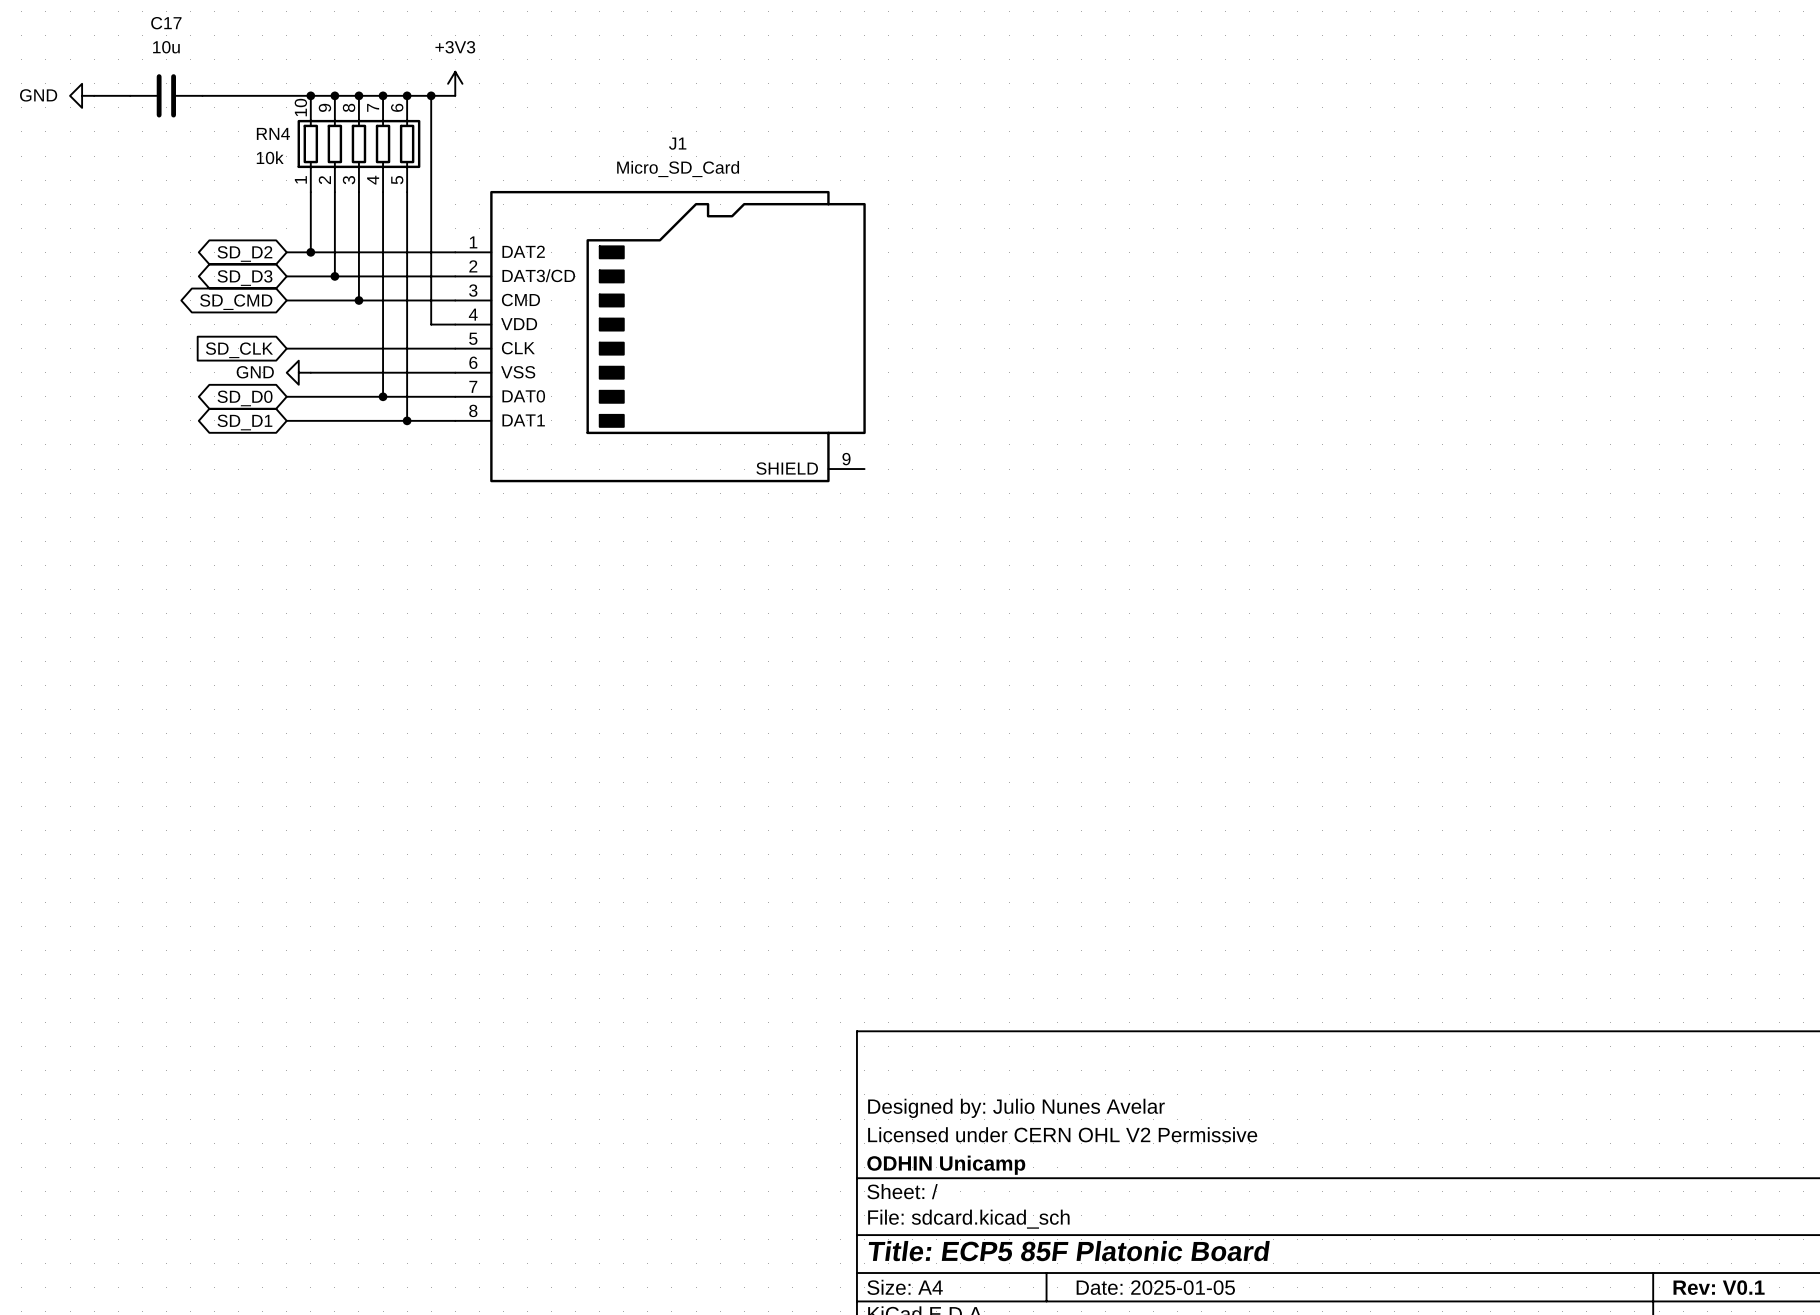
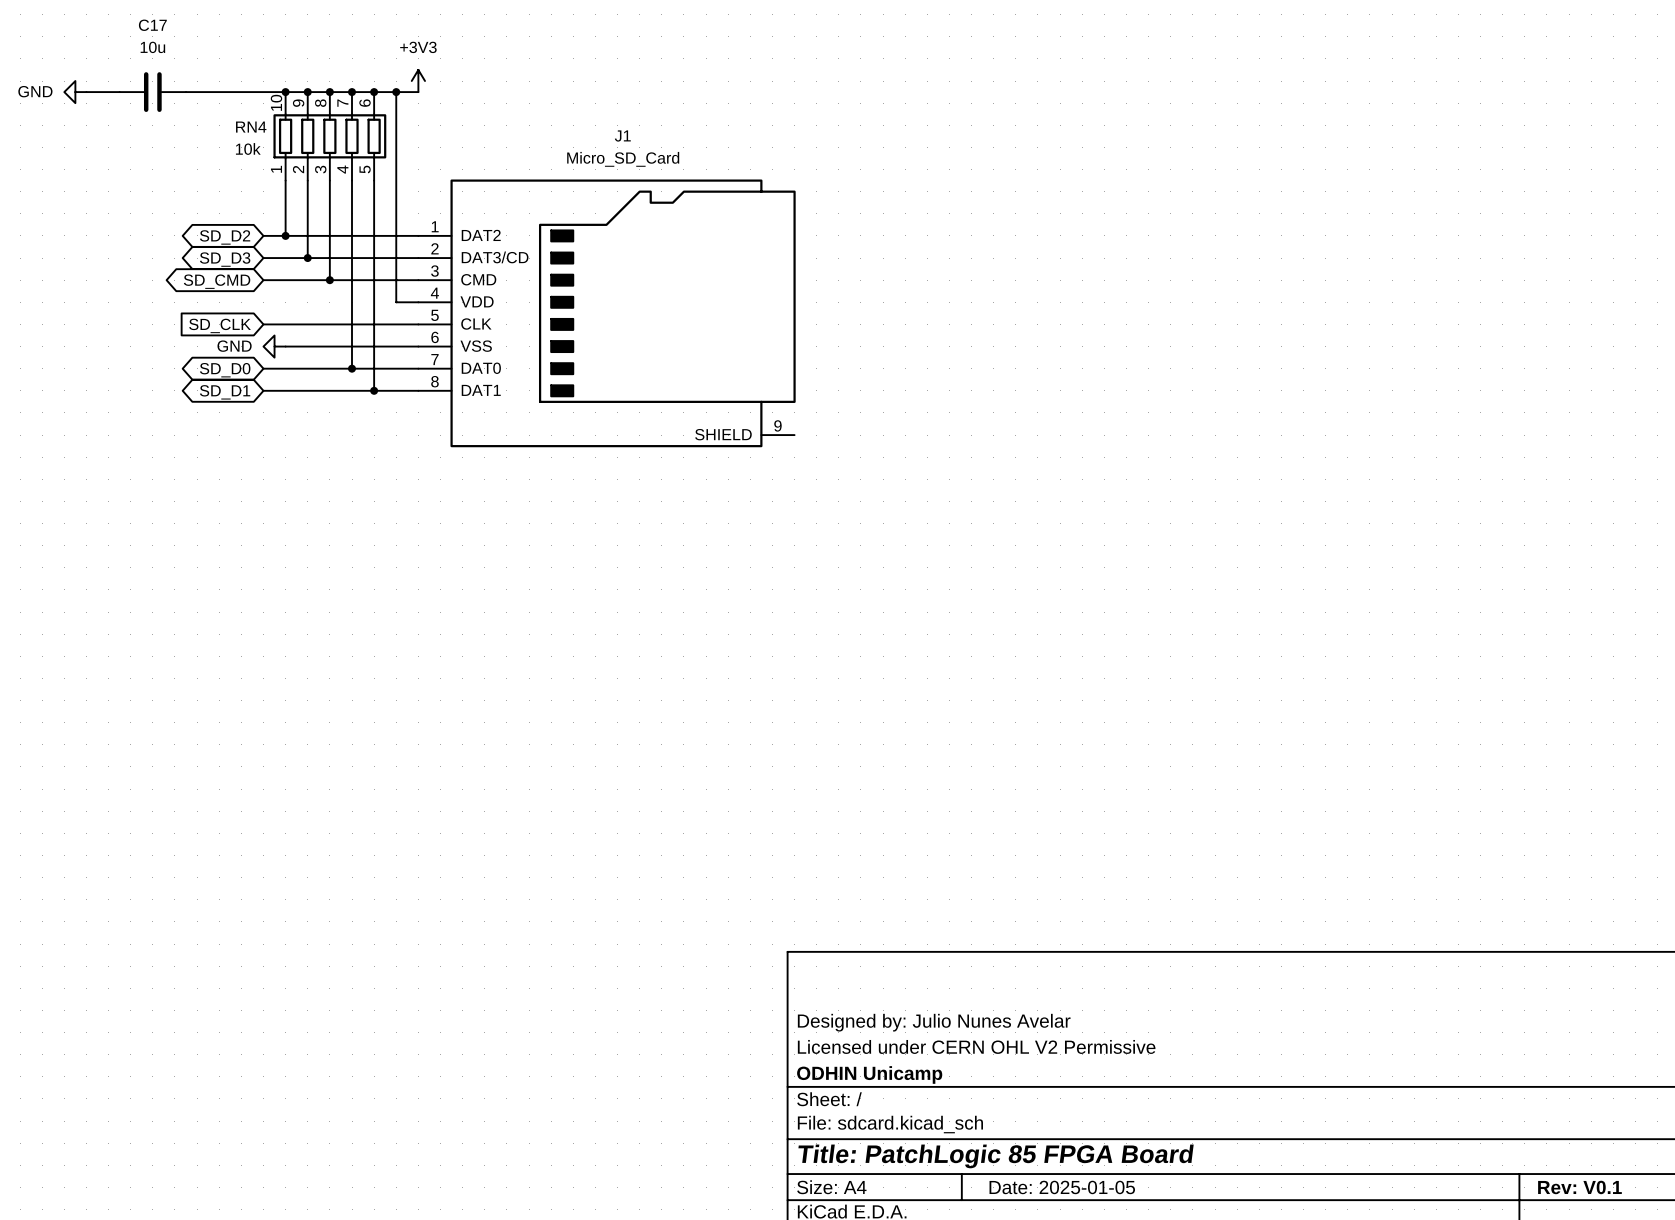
title block: Title: ECP5 85F Platonic Board (1069, 1251) -> Title: PatchLogic 85 FPGA Board (996, 1156)

